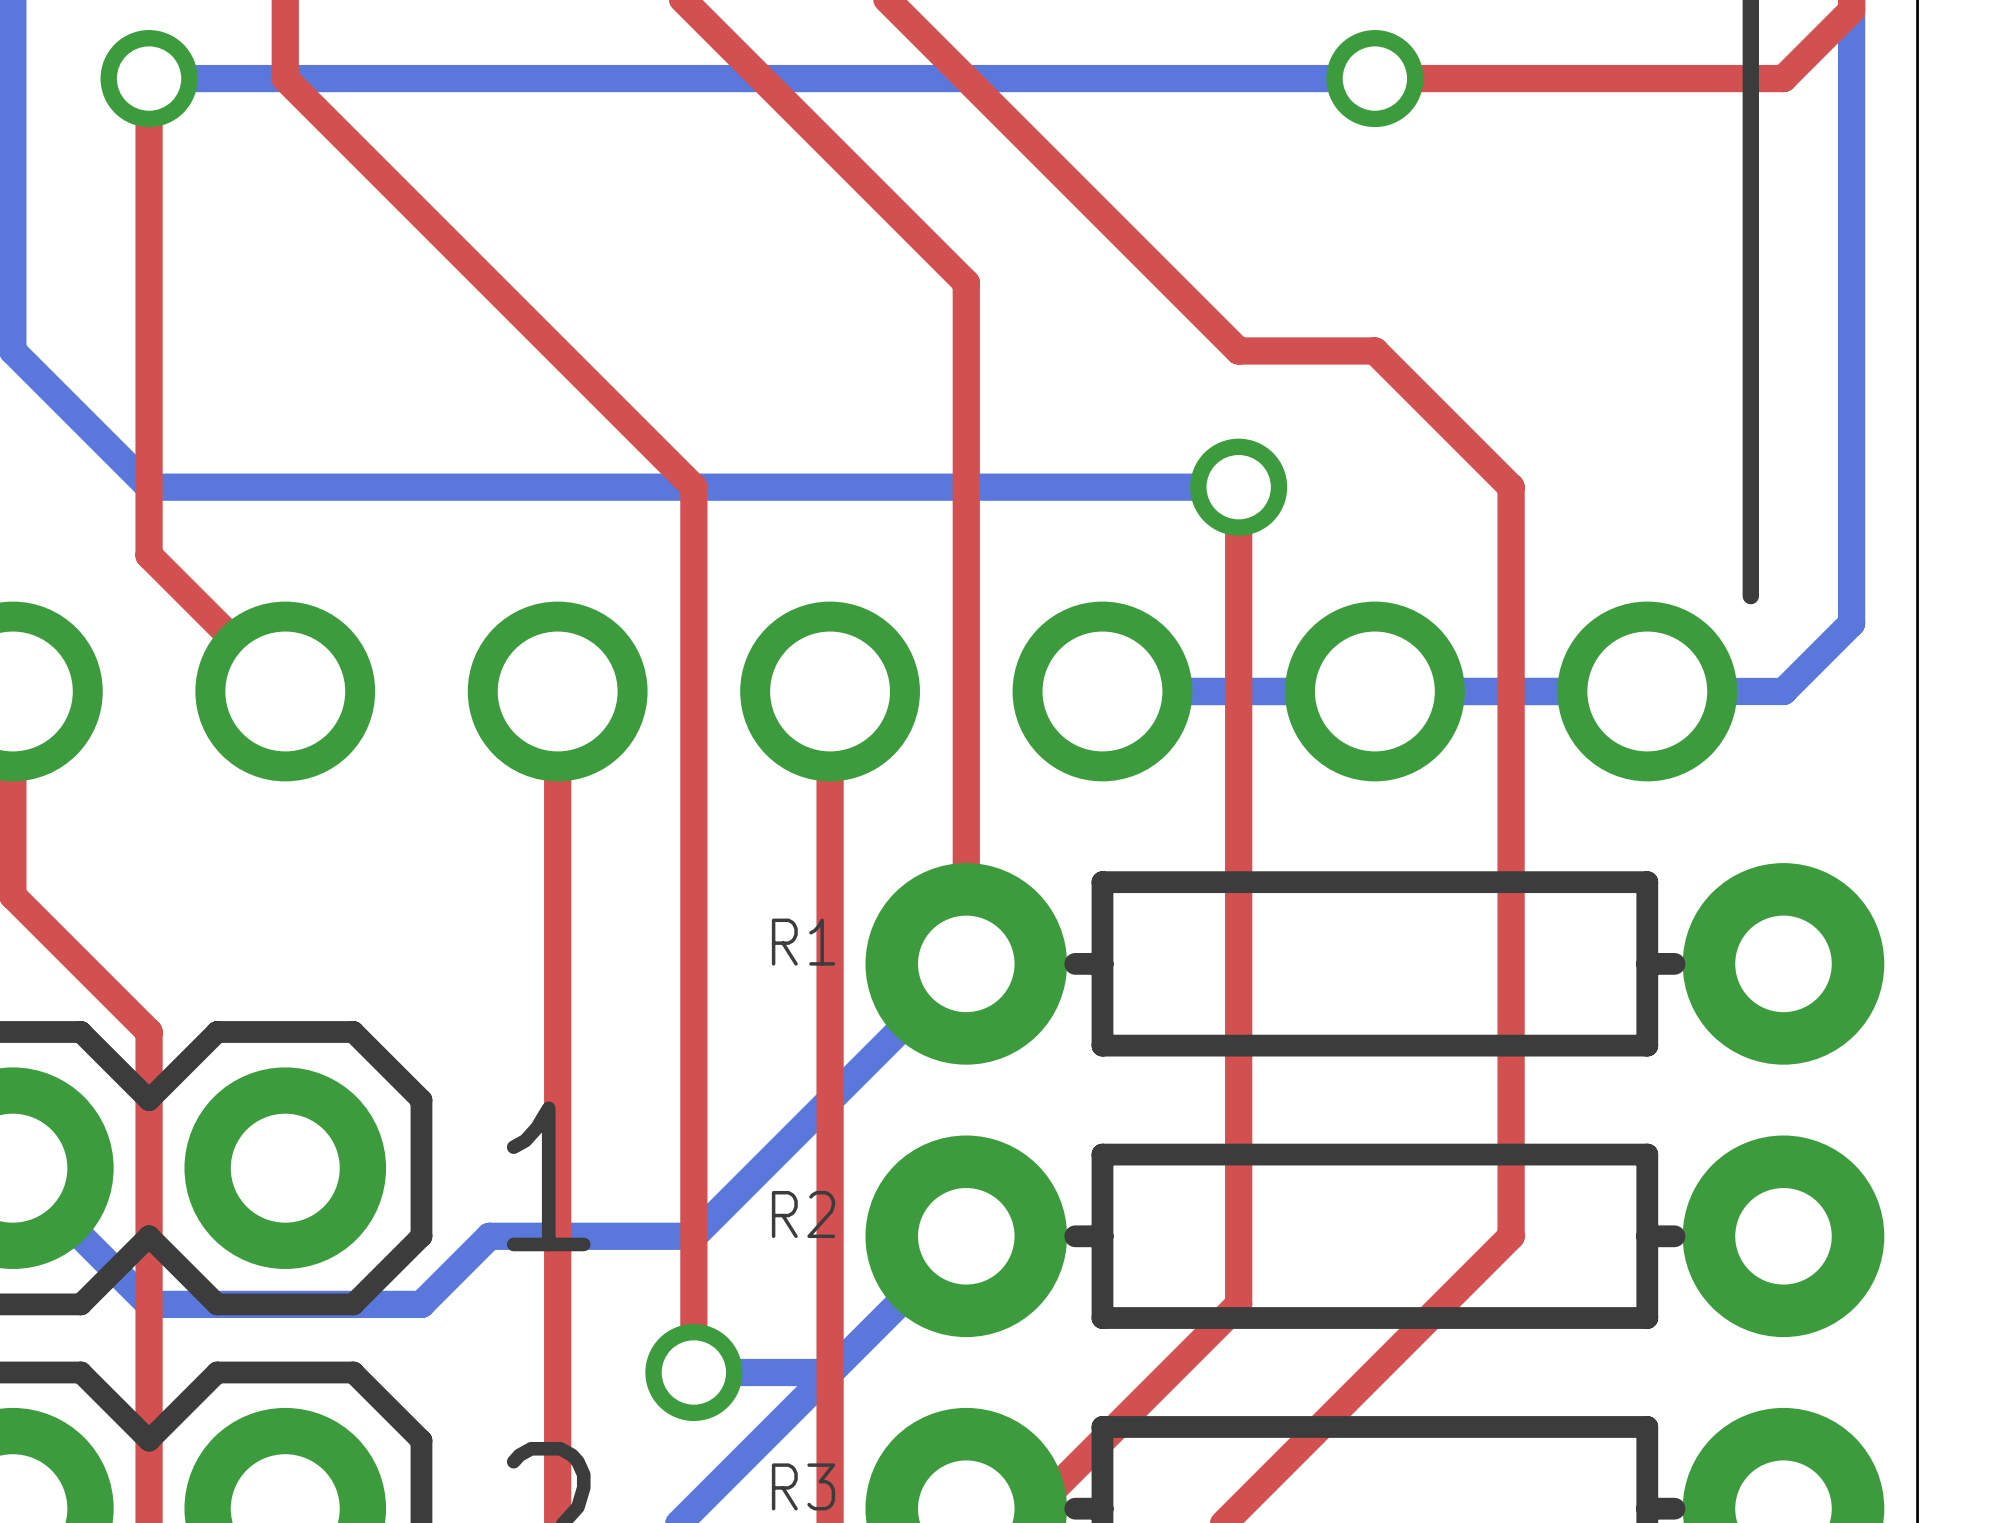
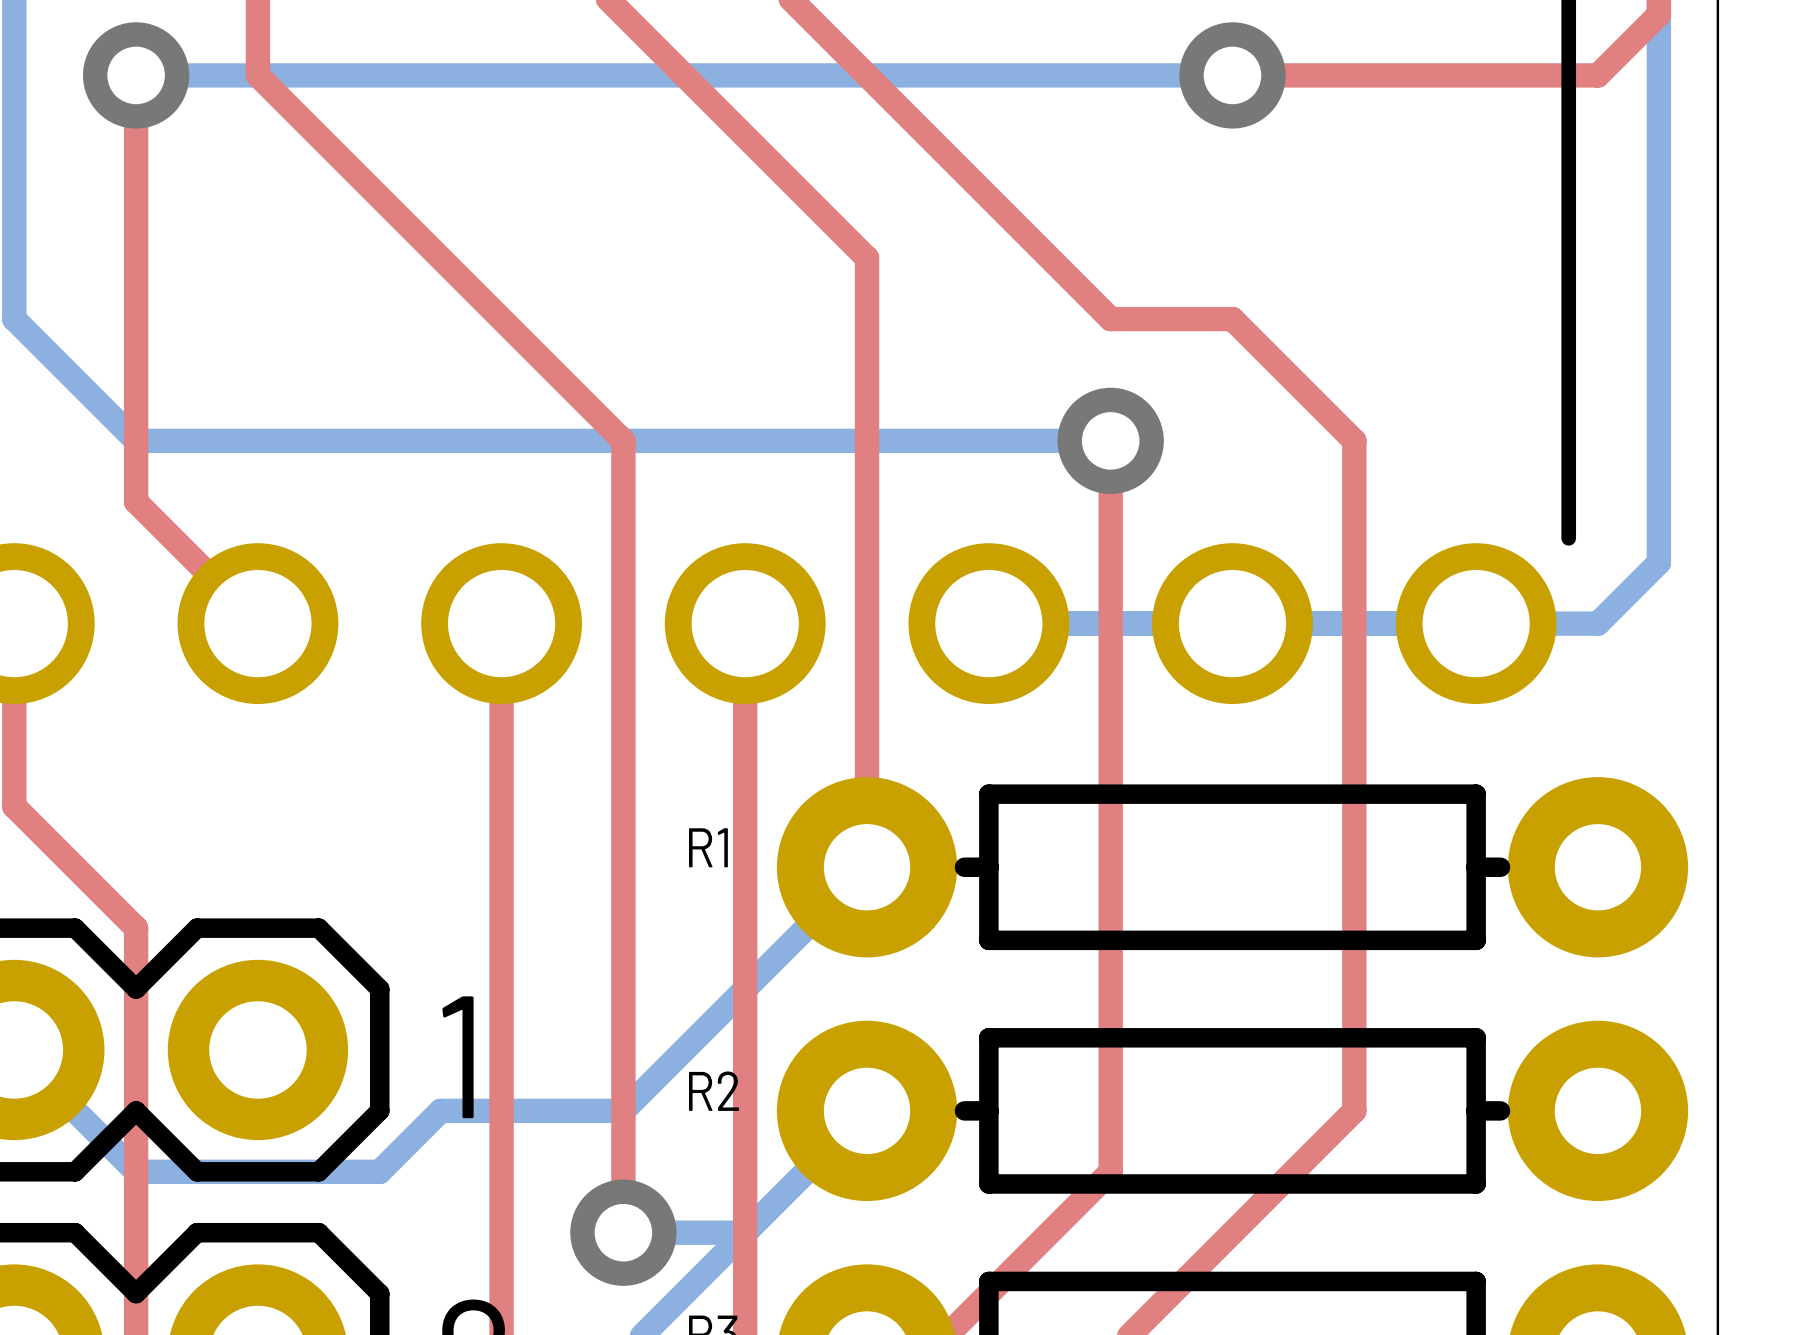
via size: [100, 30, 198, 128] -> [82, 22, 190, 129]
via size: [1326, 30, 1424, 128] -> [1179, 22, 1286, 129]
via size: [1190, 438, 1288, 536] -> [1057, 387, 1164, 495]
via size: [645, 1323, 743, 1422] -> [570, 1179, 677, 1286]

